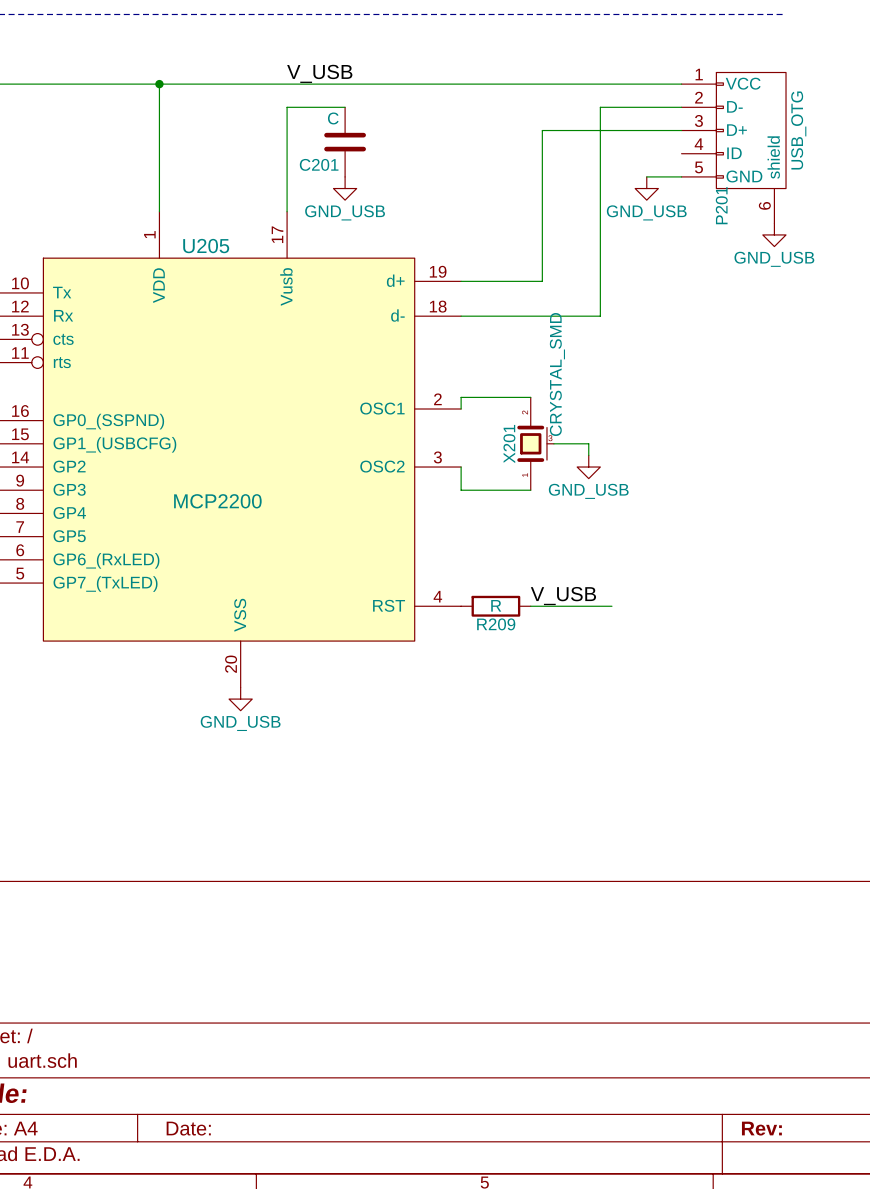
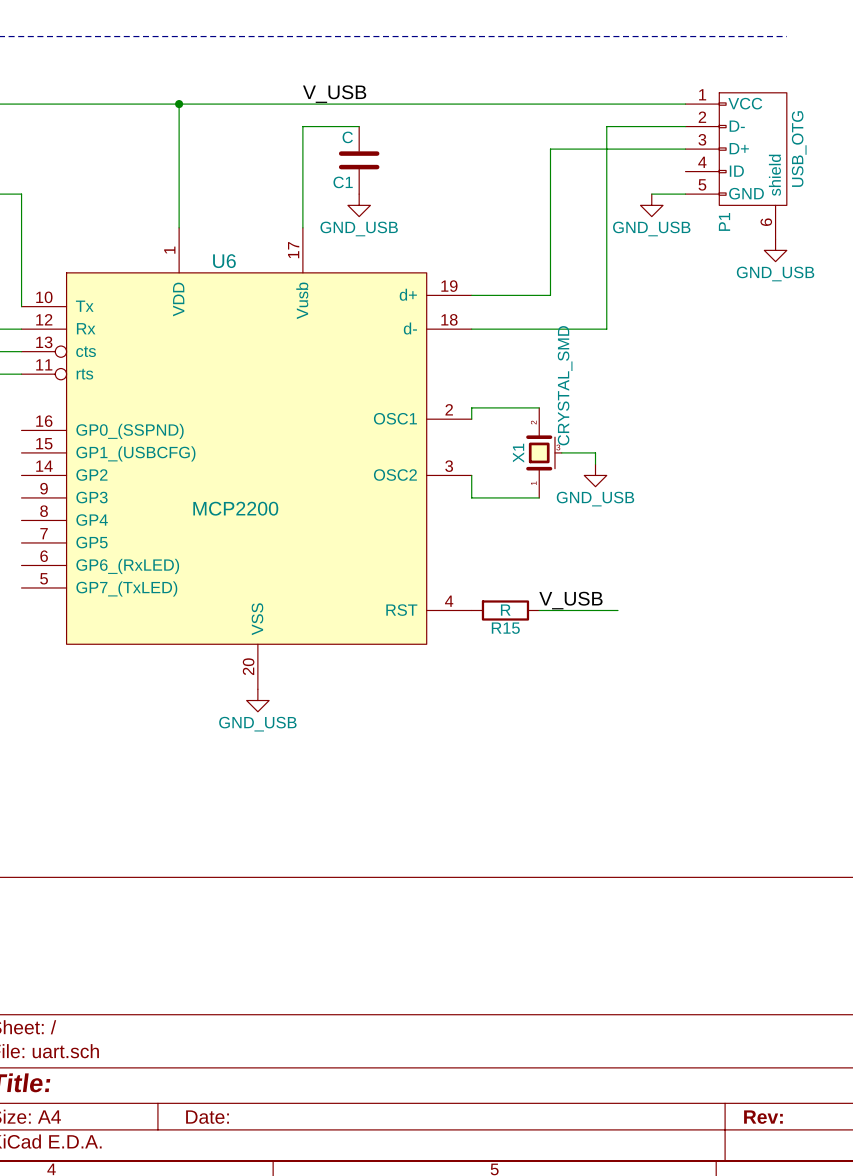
C201 name: C201 (319, 164) -> C1 (343, 182)
P201 name: P201 (721, 205) -> P1 (724, 221)
U205 name: U205 (206, 246) -> U6 (224, 261)
X201 name: X201 (509, 444) -> X1 (518, 453)
R209 name: R209 (496, 624) -> R15 (505, 628)

